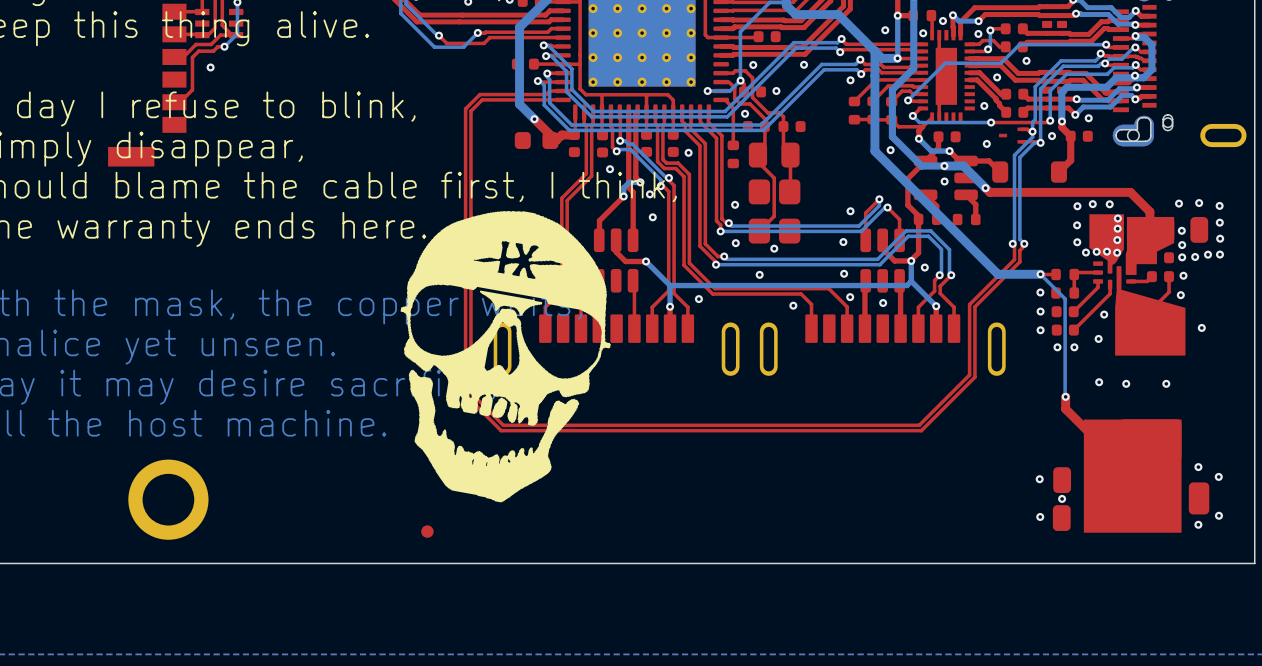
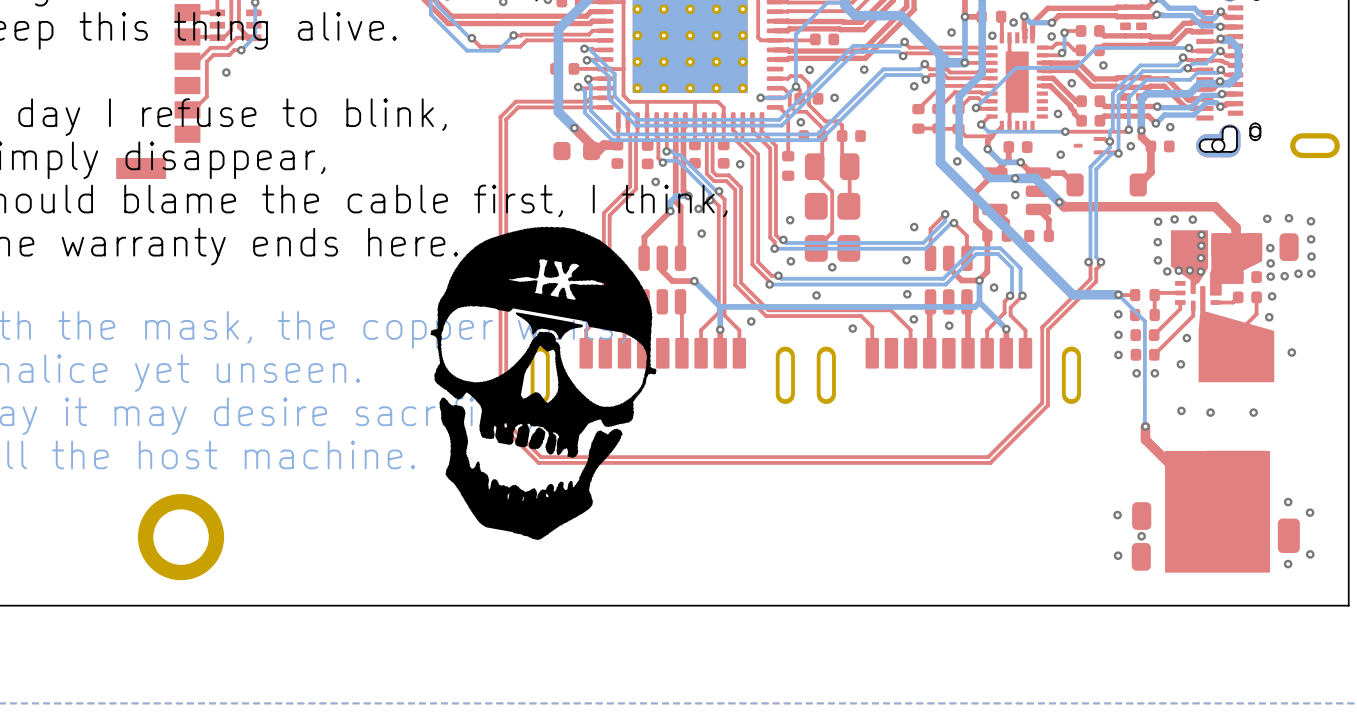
drawing: [421, 525, 434, 538] -> none

